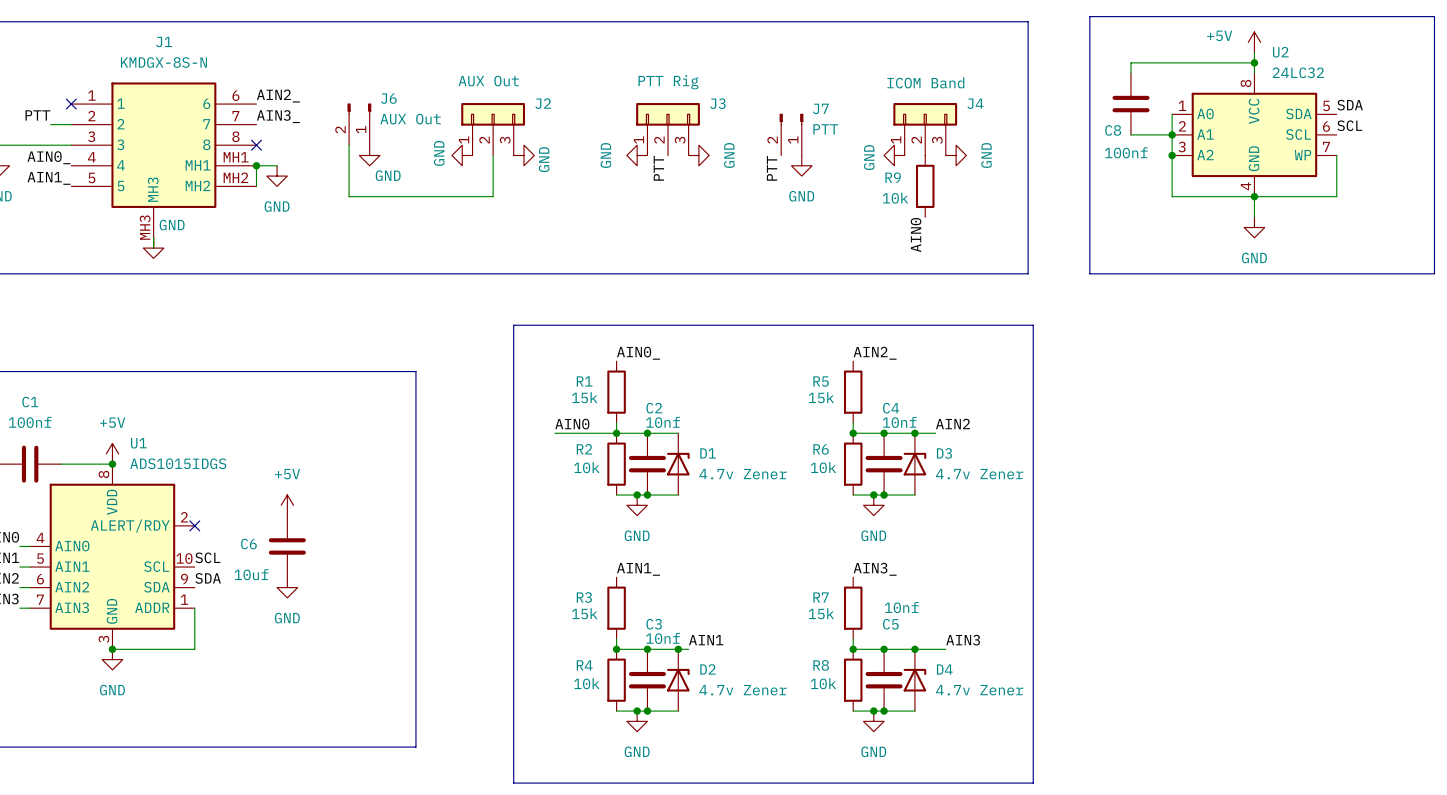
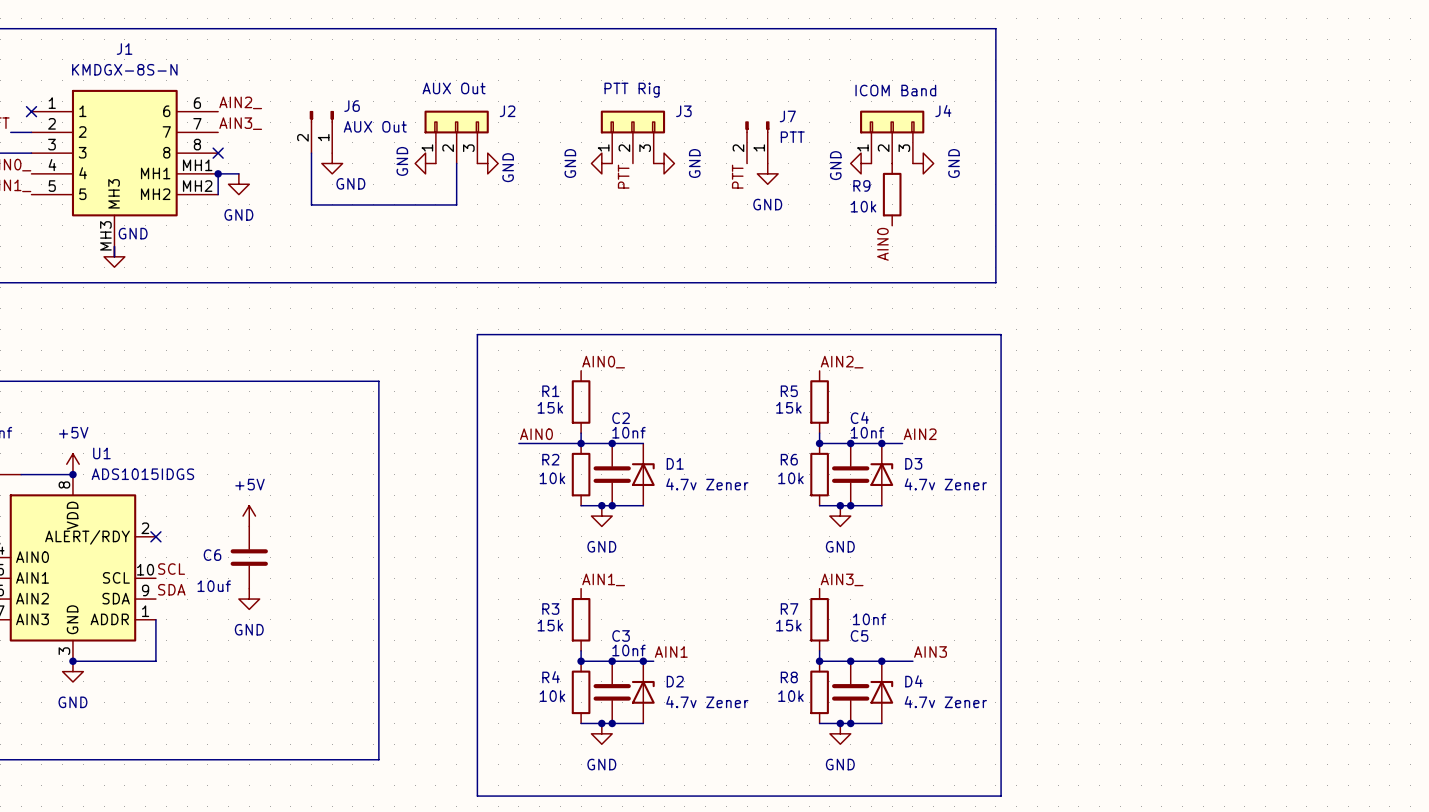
line: (1089, 16) (1434, 16) (1434, 273) (1089, 273) (1089, 16) -> none
power symbol: +5V (1254, 42) -> none
wire: (1254, 52) (1254, 73) -> none
wire: (1254, 62) (1130, 62) (1130, 73) -> none
junction: (1254, 62) -> none
C8: 100nf (1130, 104) -> none
label: SDA (1350, 105) -> none
wire: (1172, 114) (1172, 196) (1336, 196) (1336, 155) -> none
label: SCL (1349, 125) -> none
wire: (1130, 134) (1172, 134) -> none
junction: (1172, 134) -> none
U2: 24LC32 (1254, 134) -> none
junction: (1172, 155) -> none
wire: (1254, 196) (1254, 217) -> none
junction: (1254, 196) -> none
power symbol: GND (1254, 227) -> none

